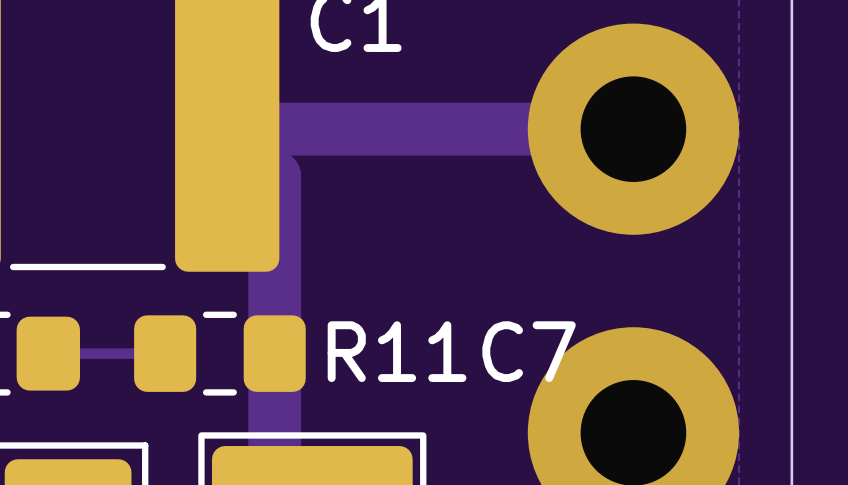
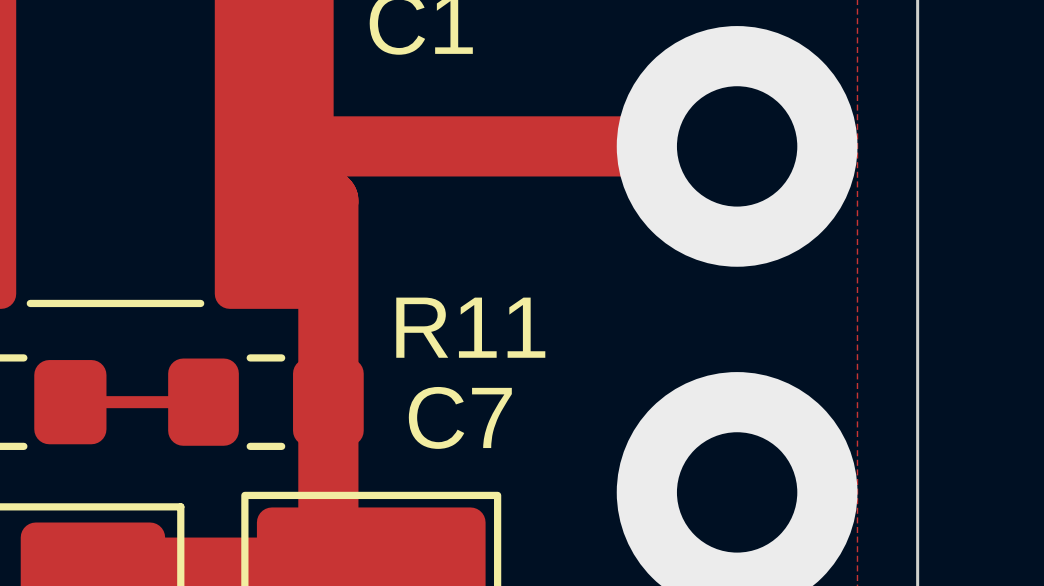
R11 name position: R11 (397, 351) -> R11 (470, 327)
C7 name position: C7 (529, 351) -> C7 (460, 417)

